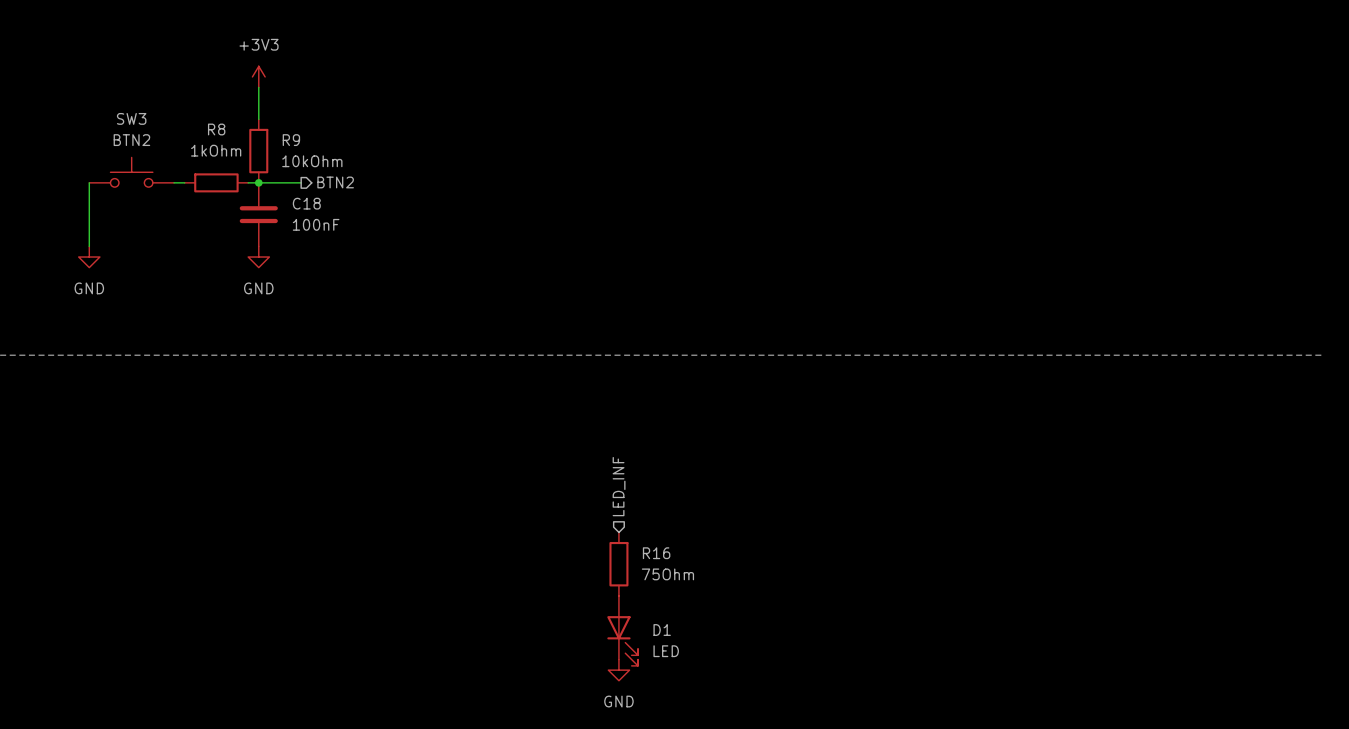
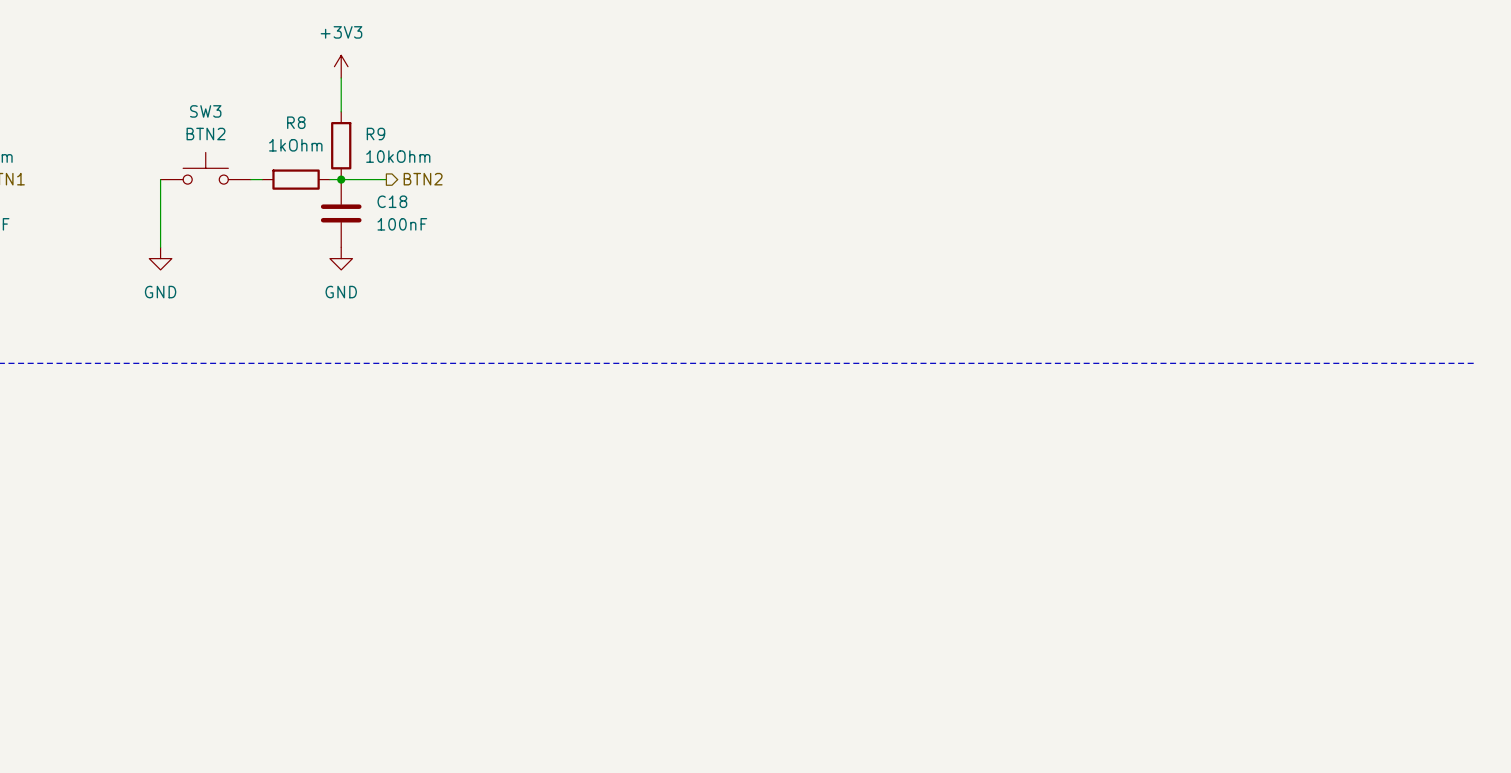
hierarchical label: LED_INF (619, 486) -> none
R16: 75Ohm (618, 564) -> none
D1: LED (622, 630) -> none
power symbol: GND (618, 670) -> none

